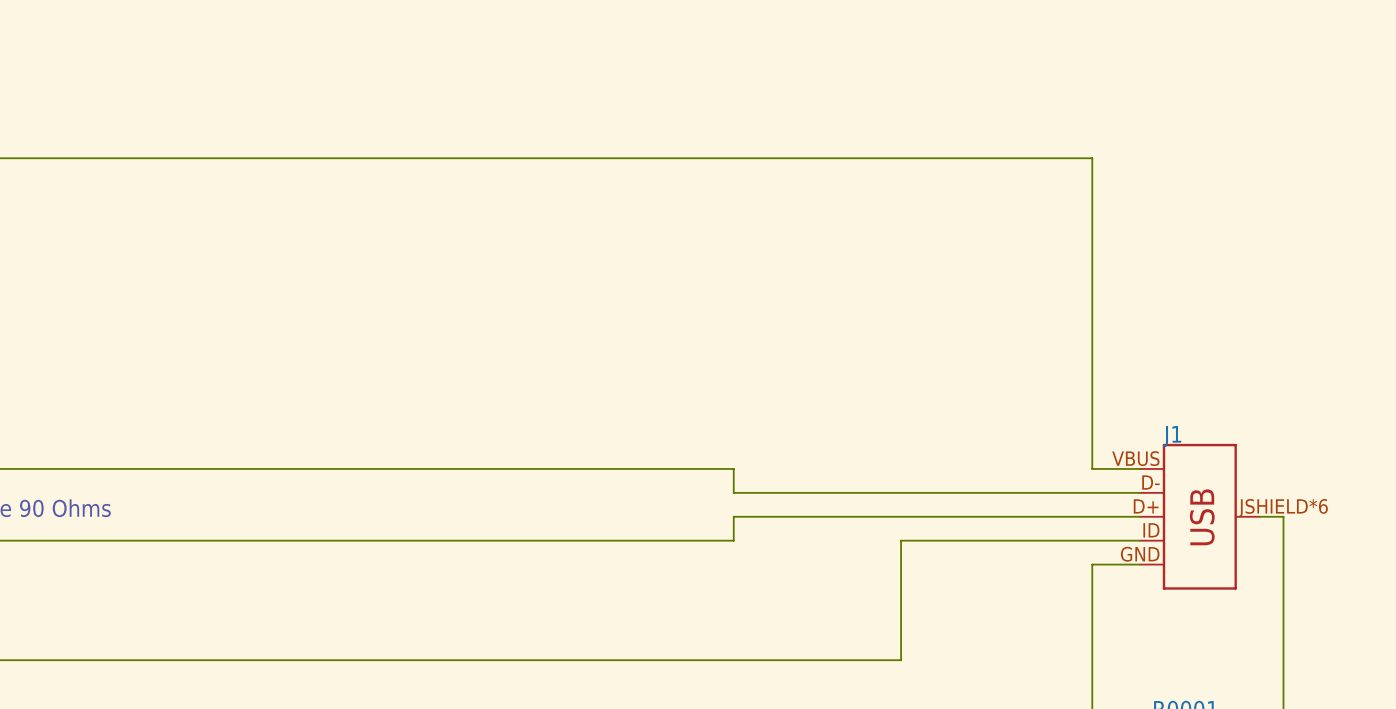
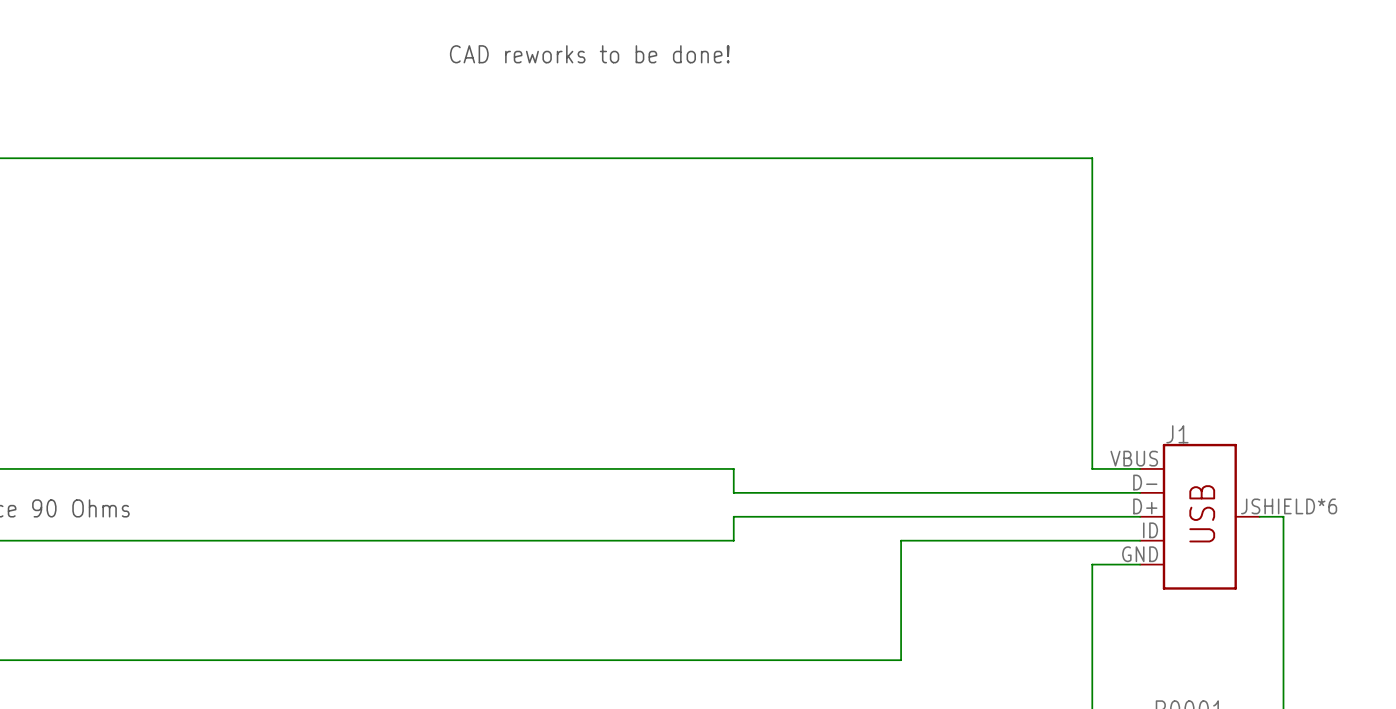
text: none -> CAD reworks to be done! (589, 54)

